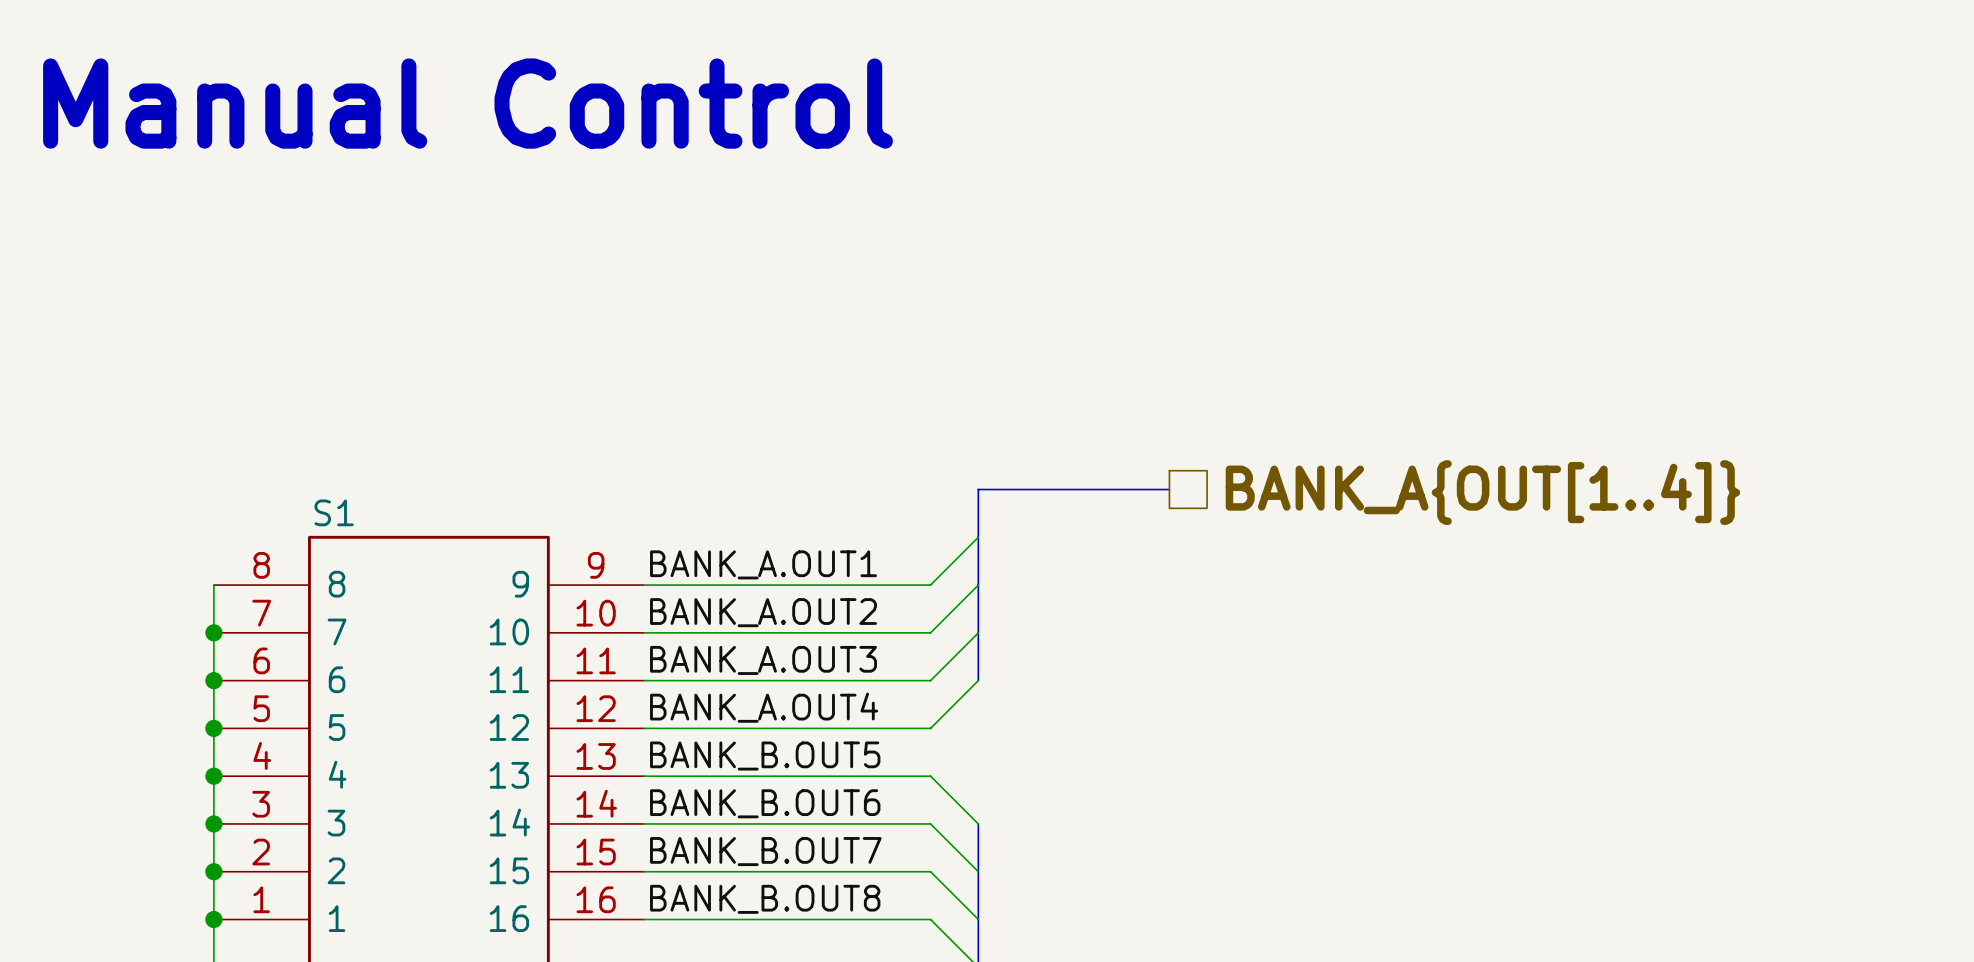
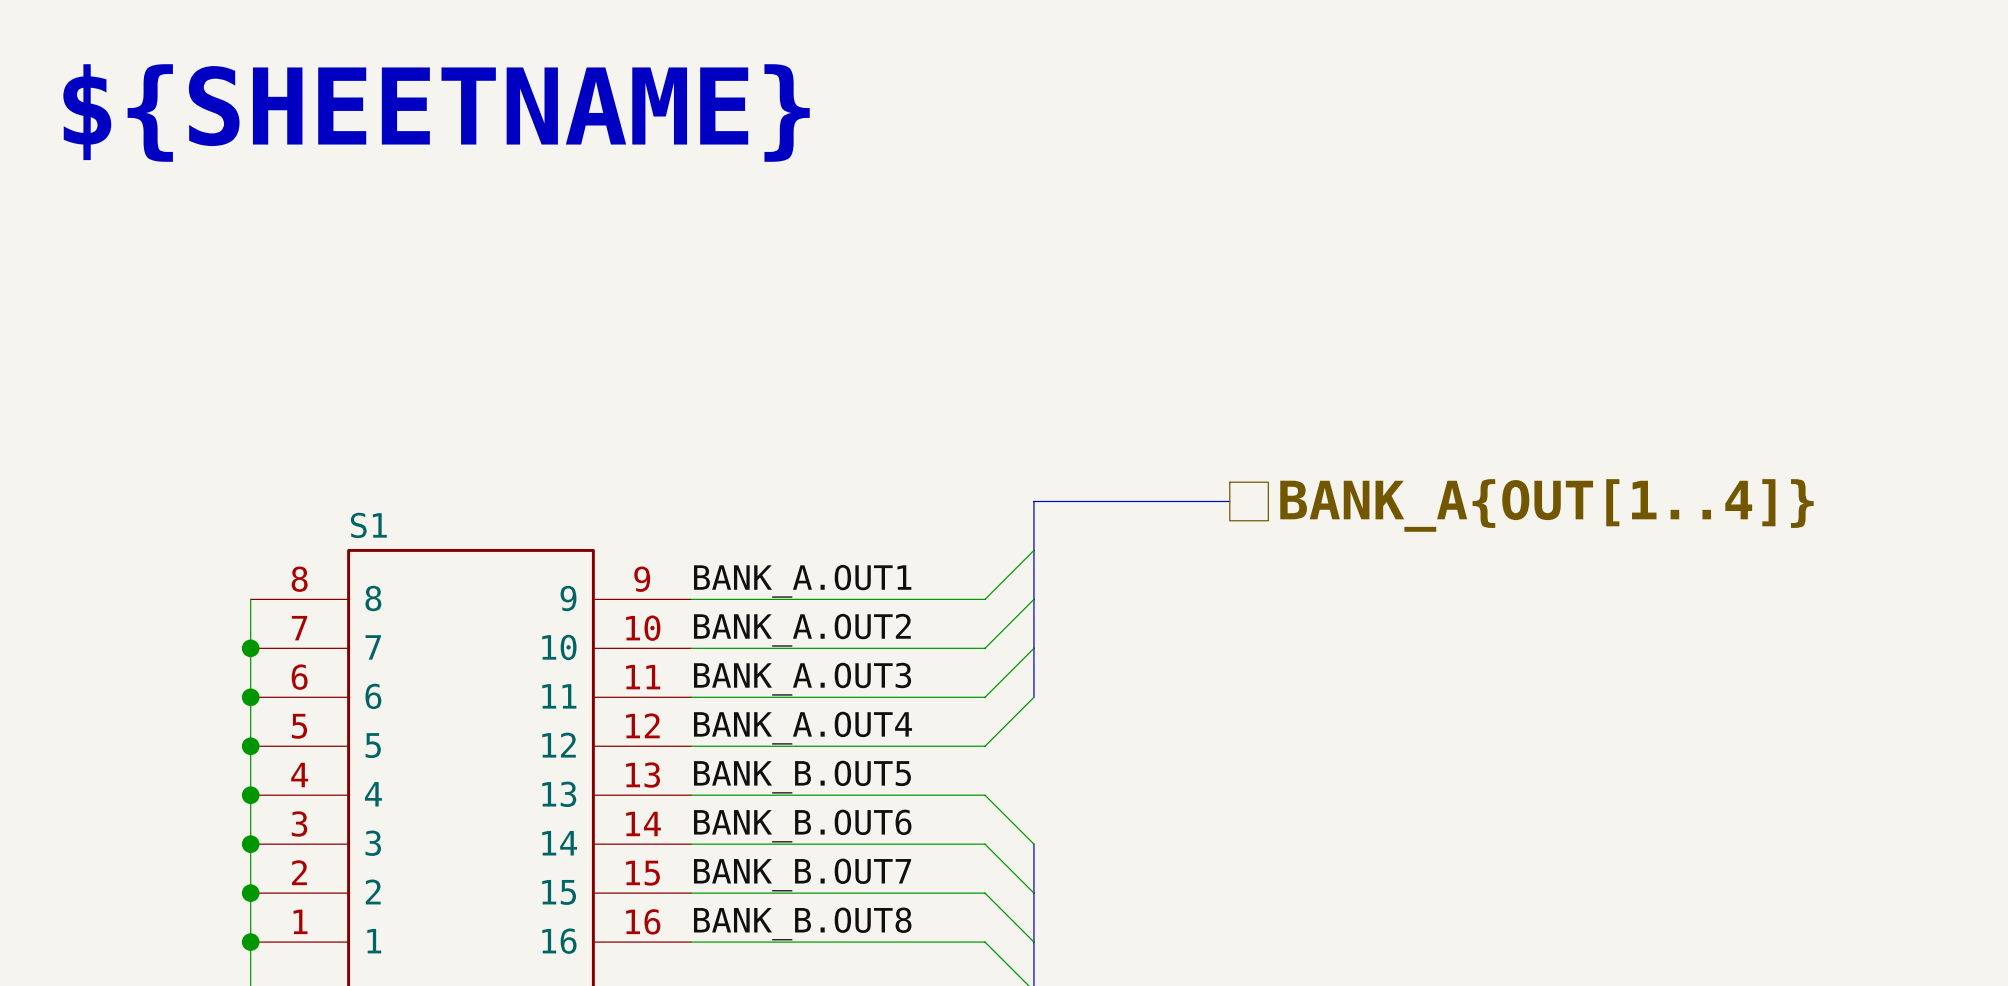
text: Manual Control (468, 103) -> ${SHEETNAME} (436, 113)

